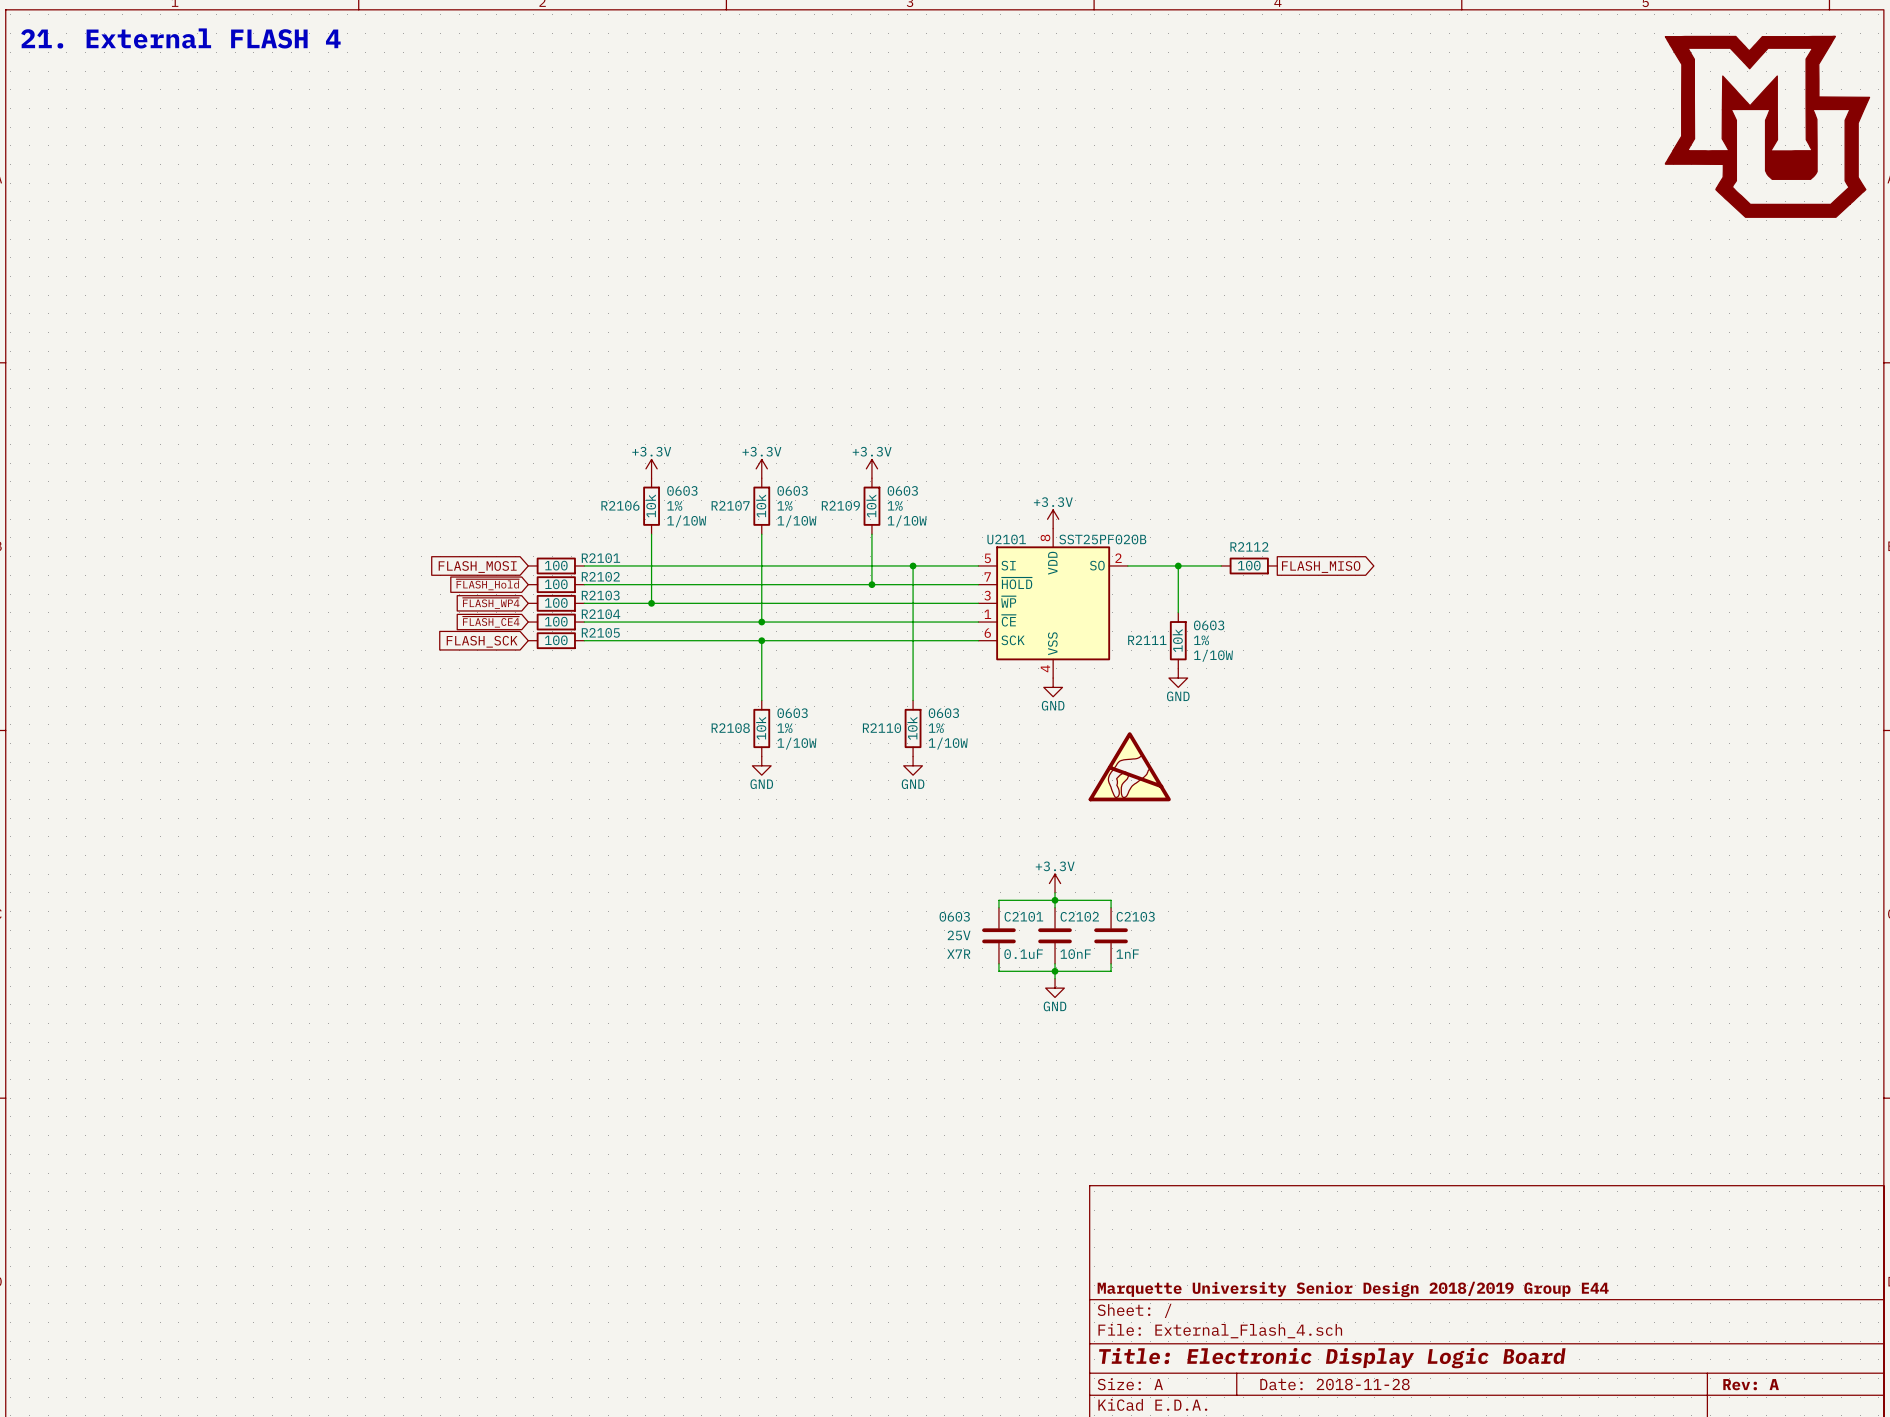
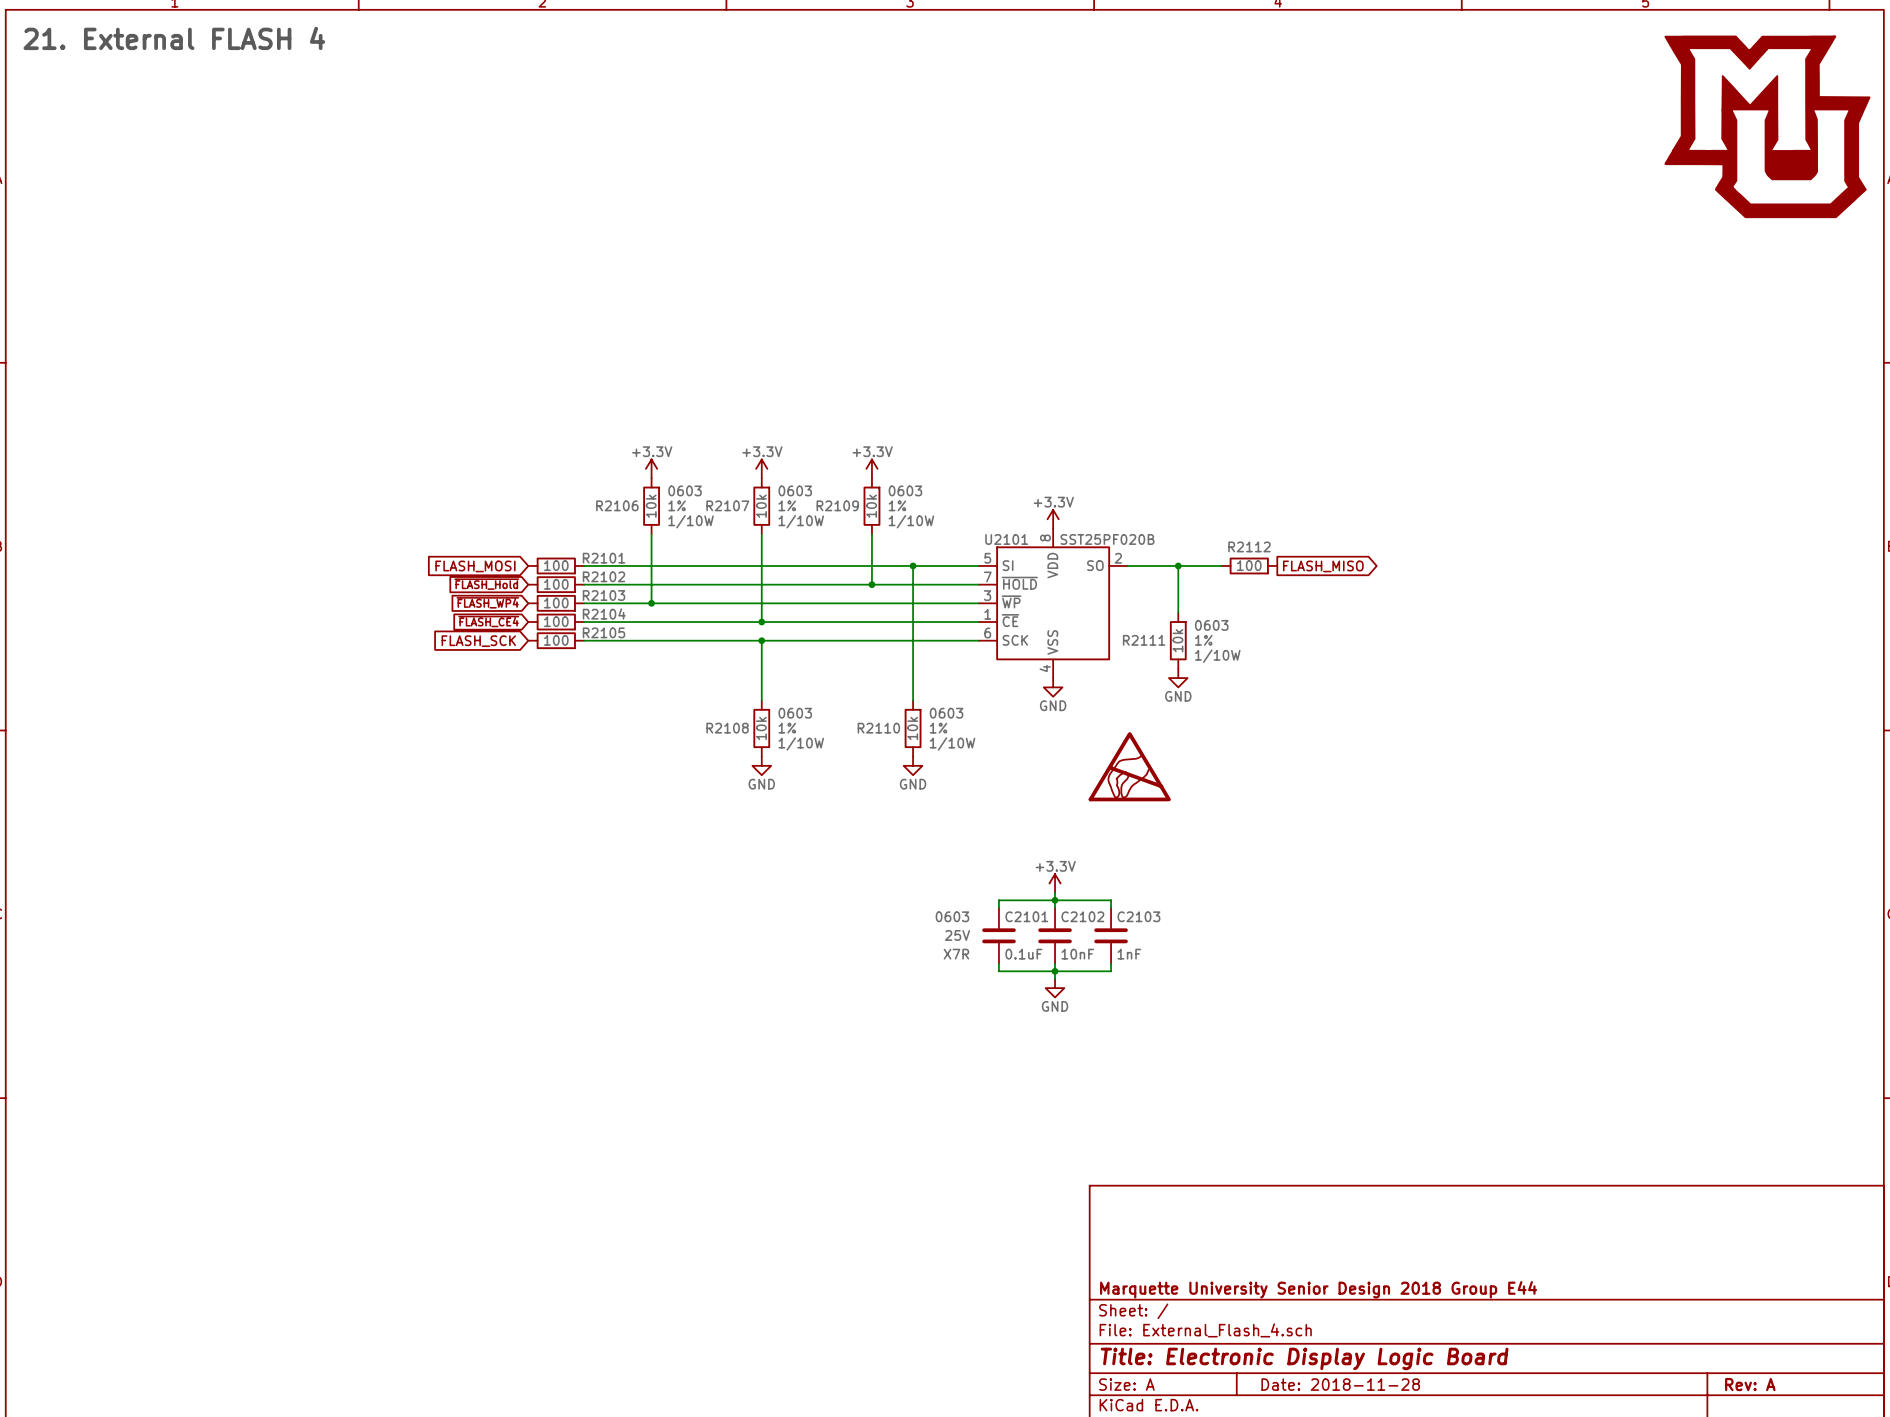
title block: Marquette University Senior Design 2018/2019 Group E44 (1353, 1289) -> Marquette University Senior Design 2018 Group E44 (1318, 1289)

